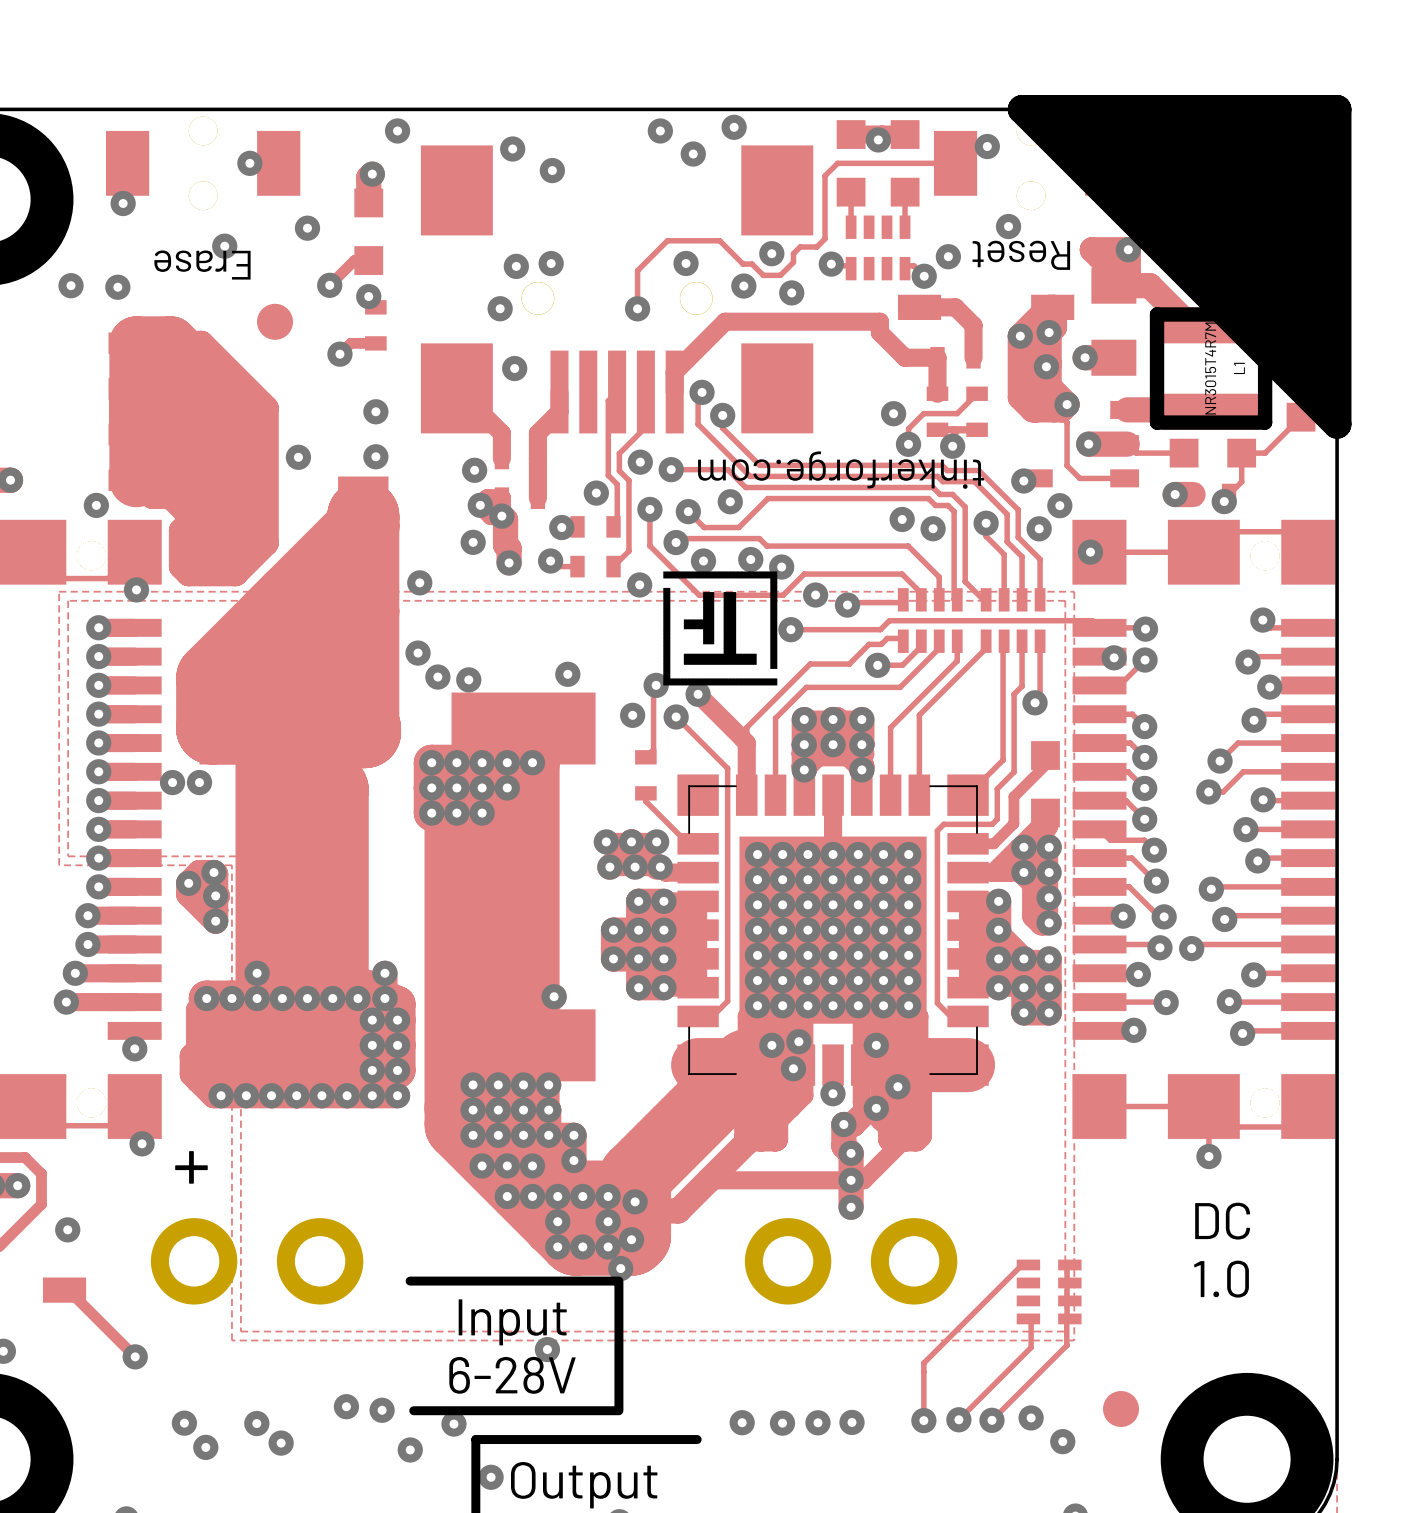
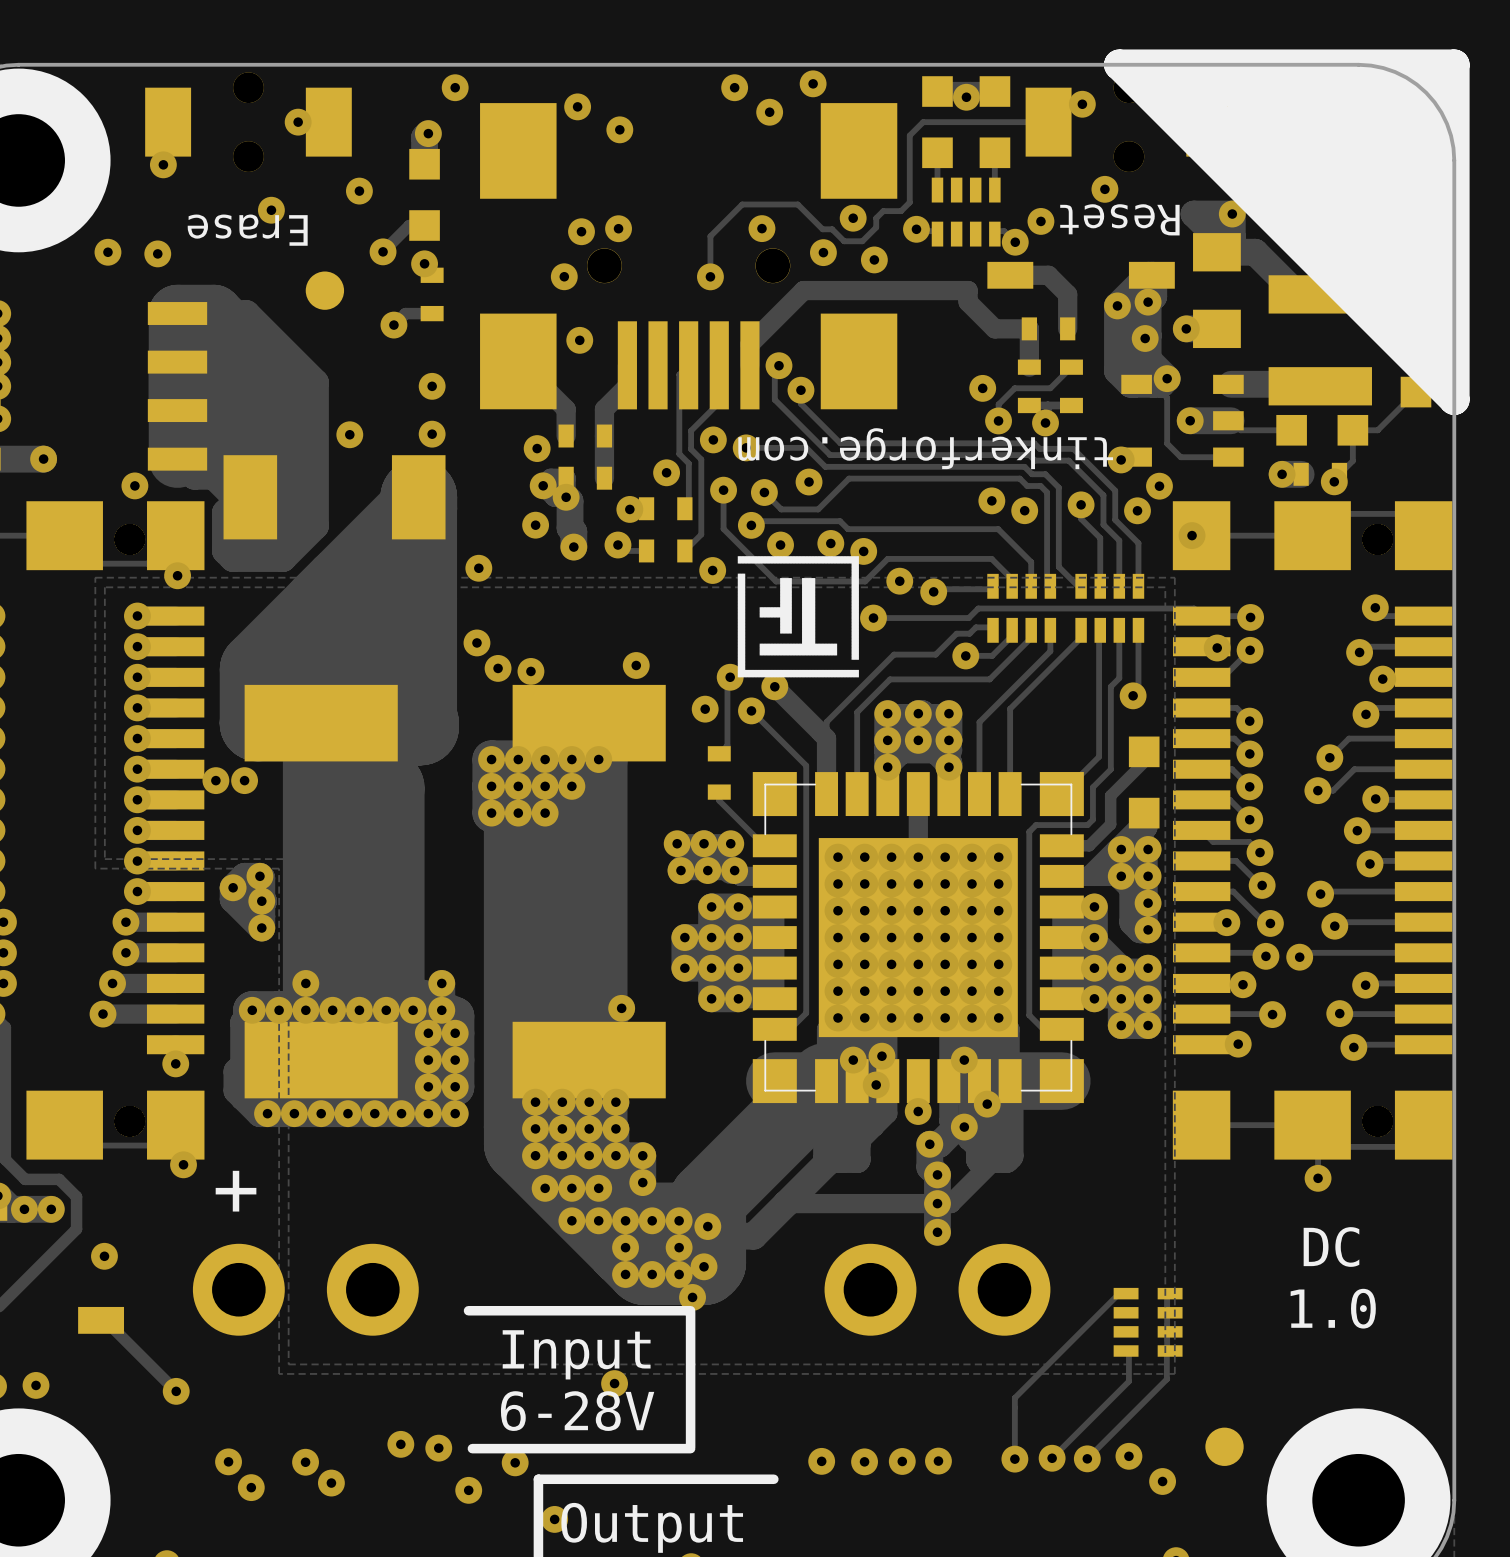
L1: NR3015T4R7M (1211, 368) -> none
part: none -> (1320, 340)

